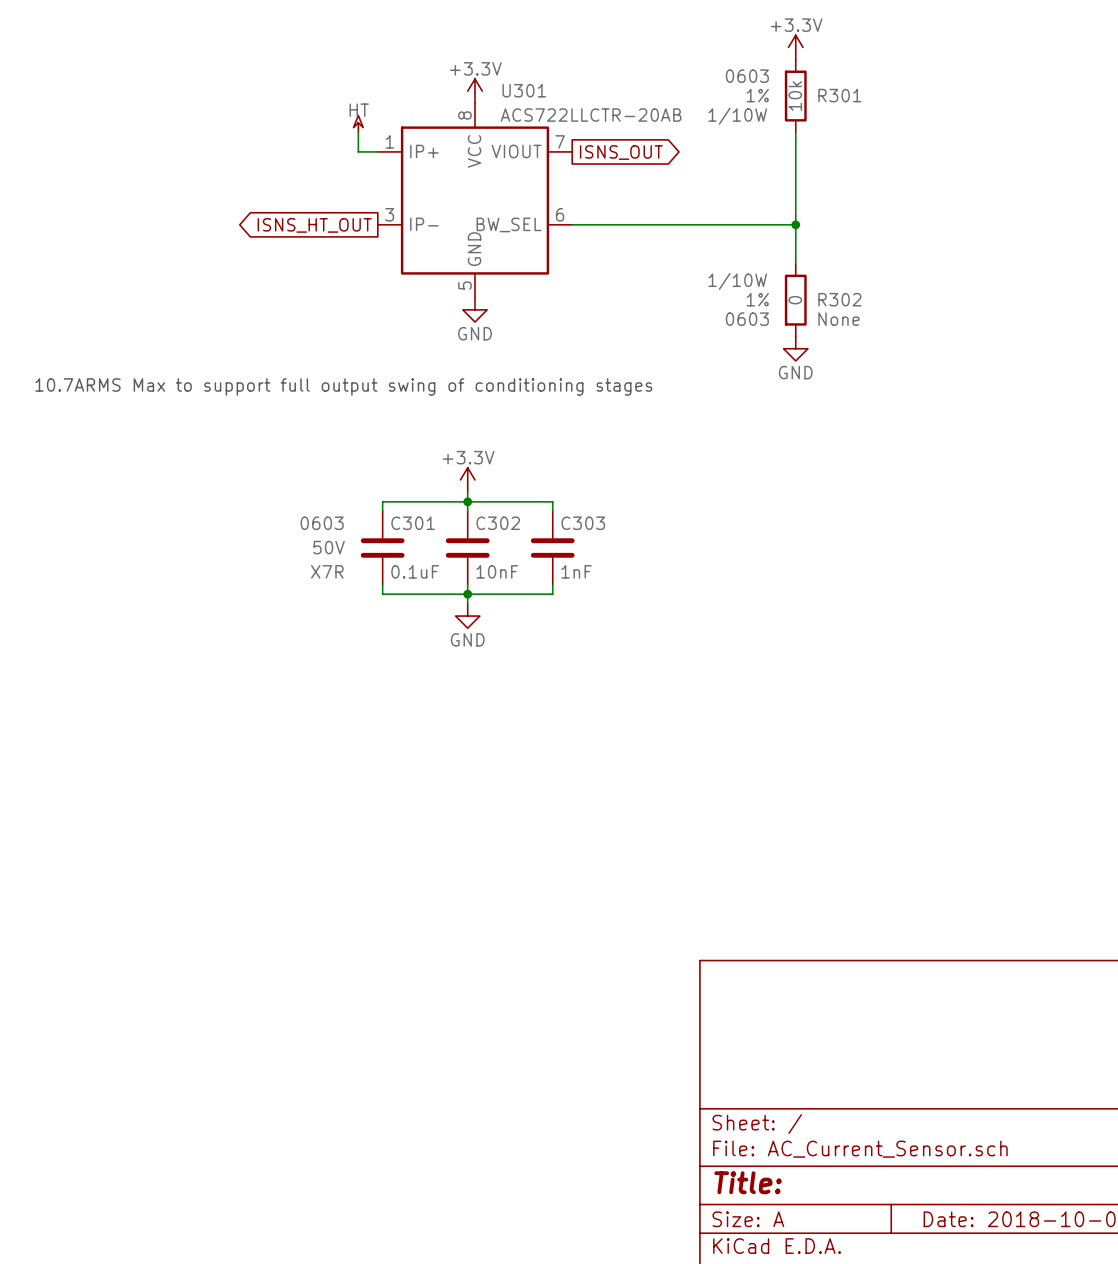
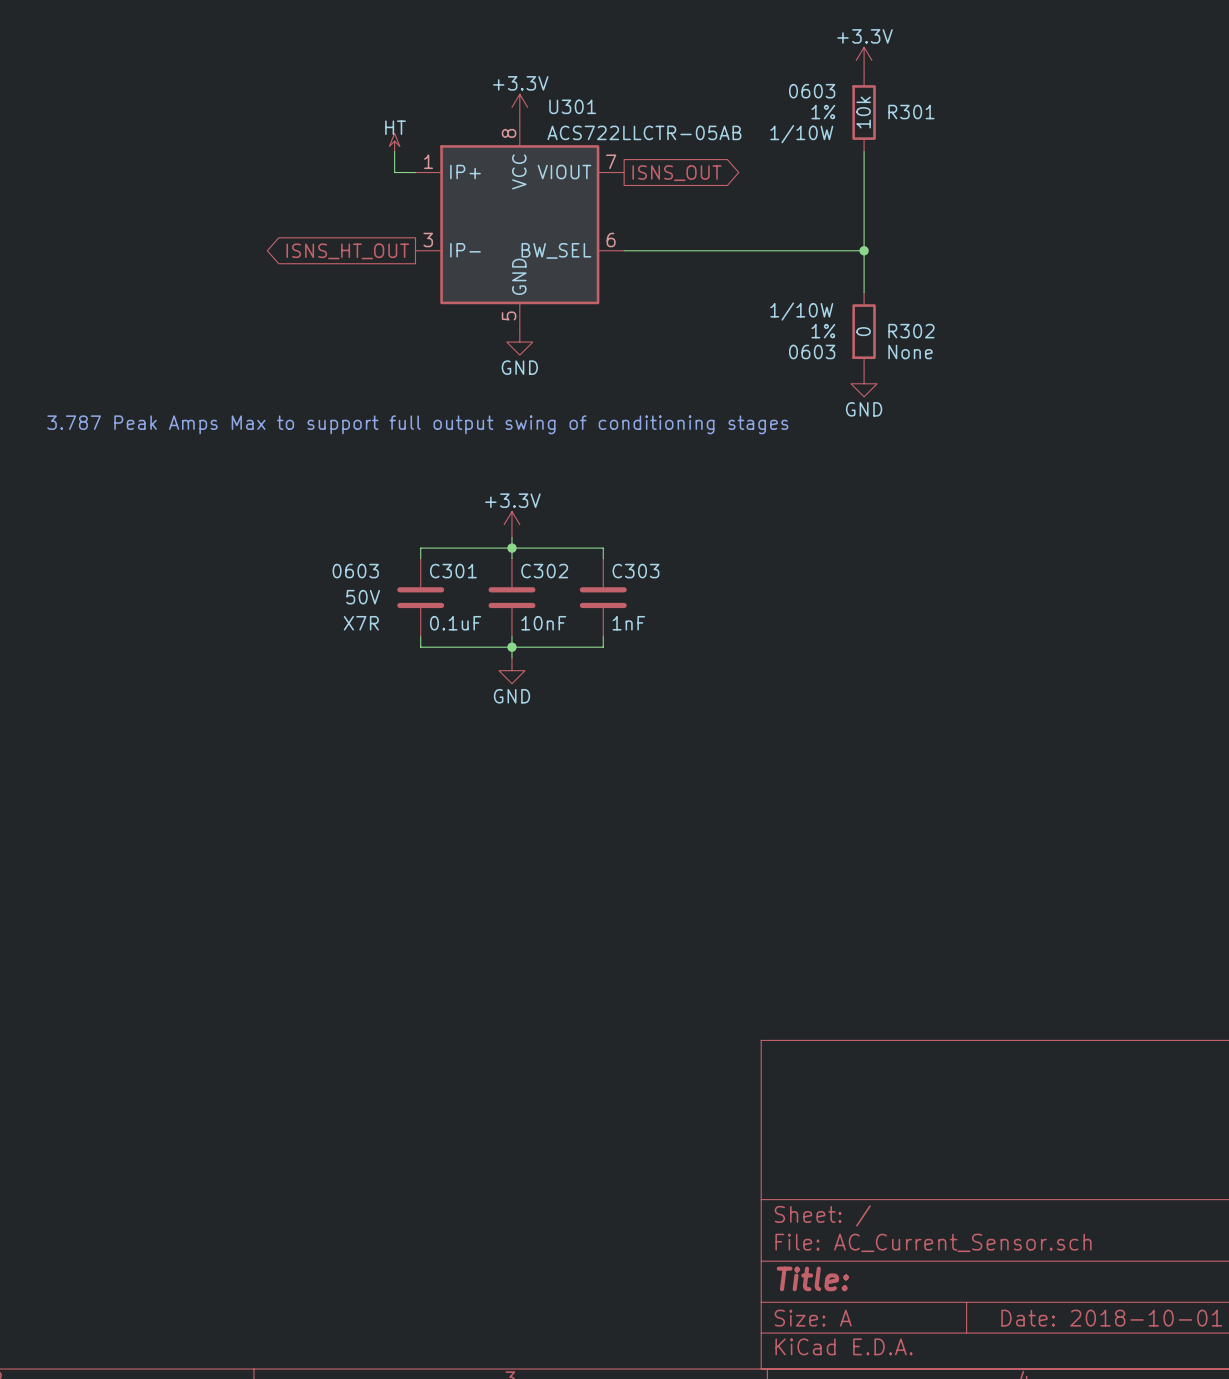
U301 value: ACS722LLCTR-20AB (591, 115) -> ACS722LLCTR-05AB (644, 132)
text: 10.7ARMS Max to support full output swing of conditioning stages (343, 387) -> 3.787 Peak Amps Max to support full output swing of conditioning stages (417, 424)

